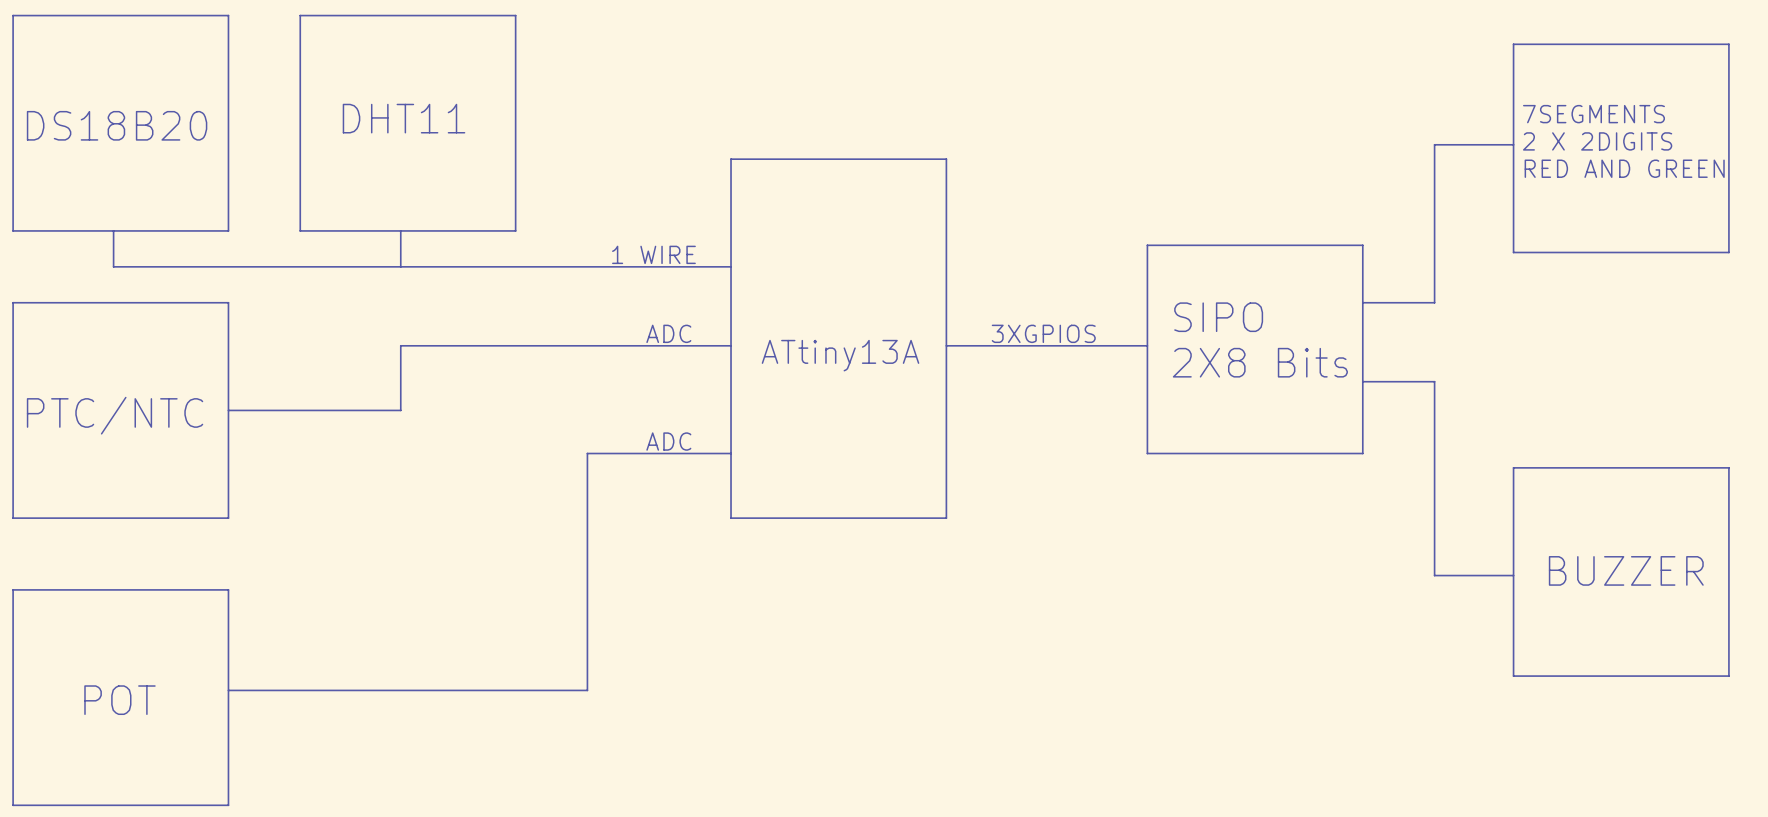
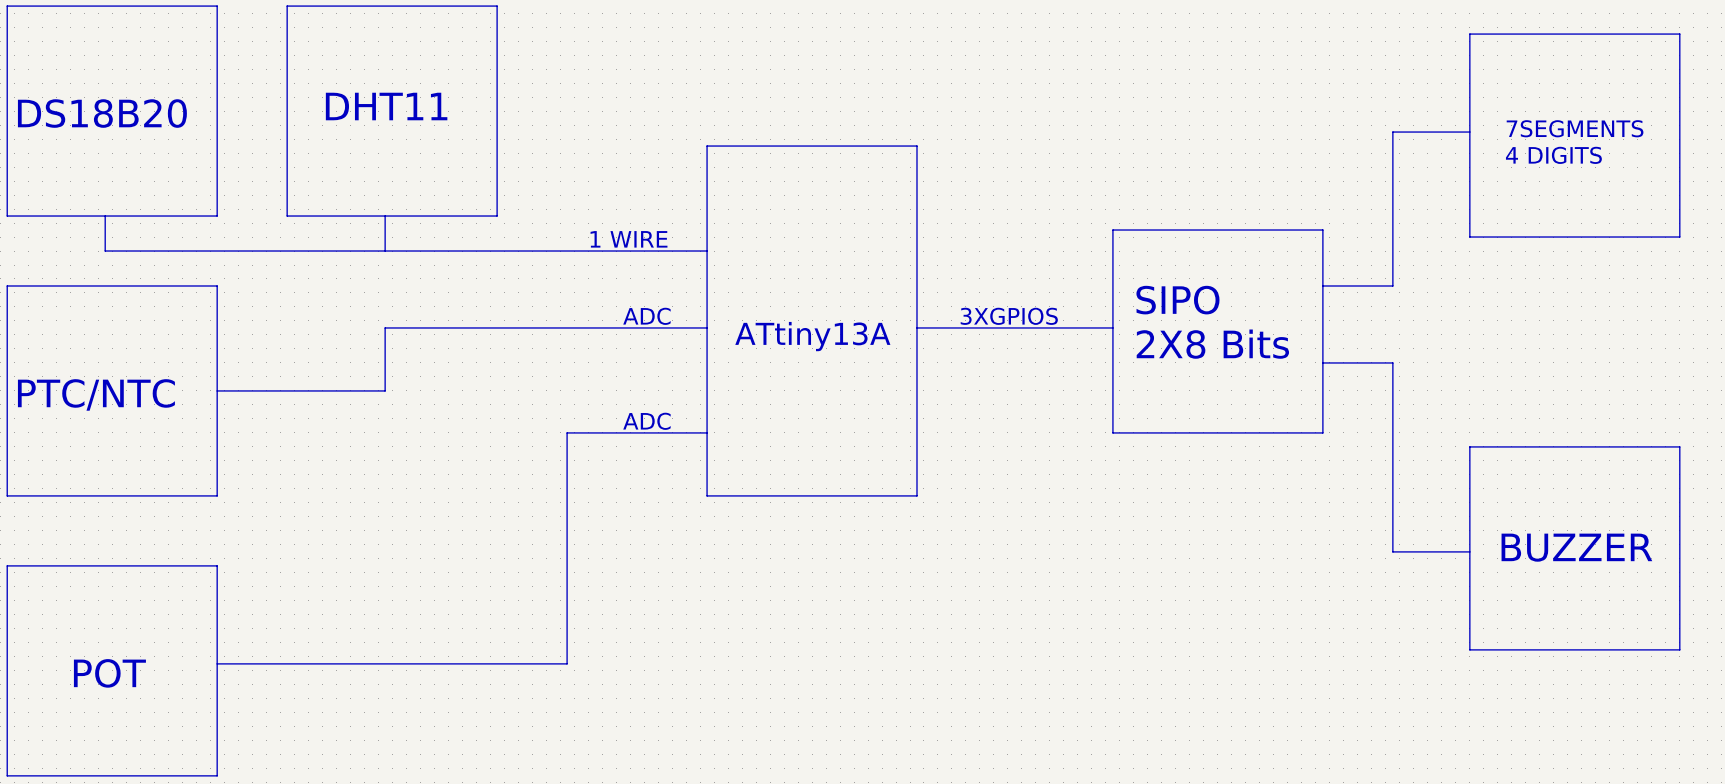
text position: 7SEGMENTS (1593, 114) -> 7SEGMENTS (1575, 128)
text: 2 X 2DIGITS (1597, 141) -> 4 DIGITS (1553, 155)
text: RED AND GREEN (1624, 168) -> none

